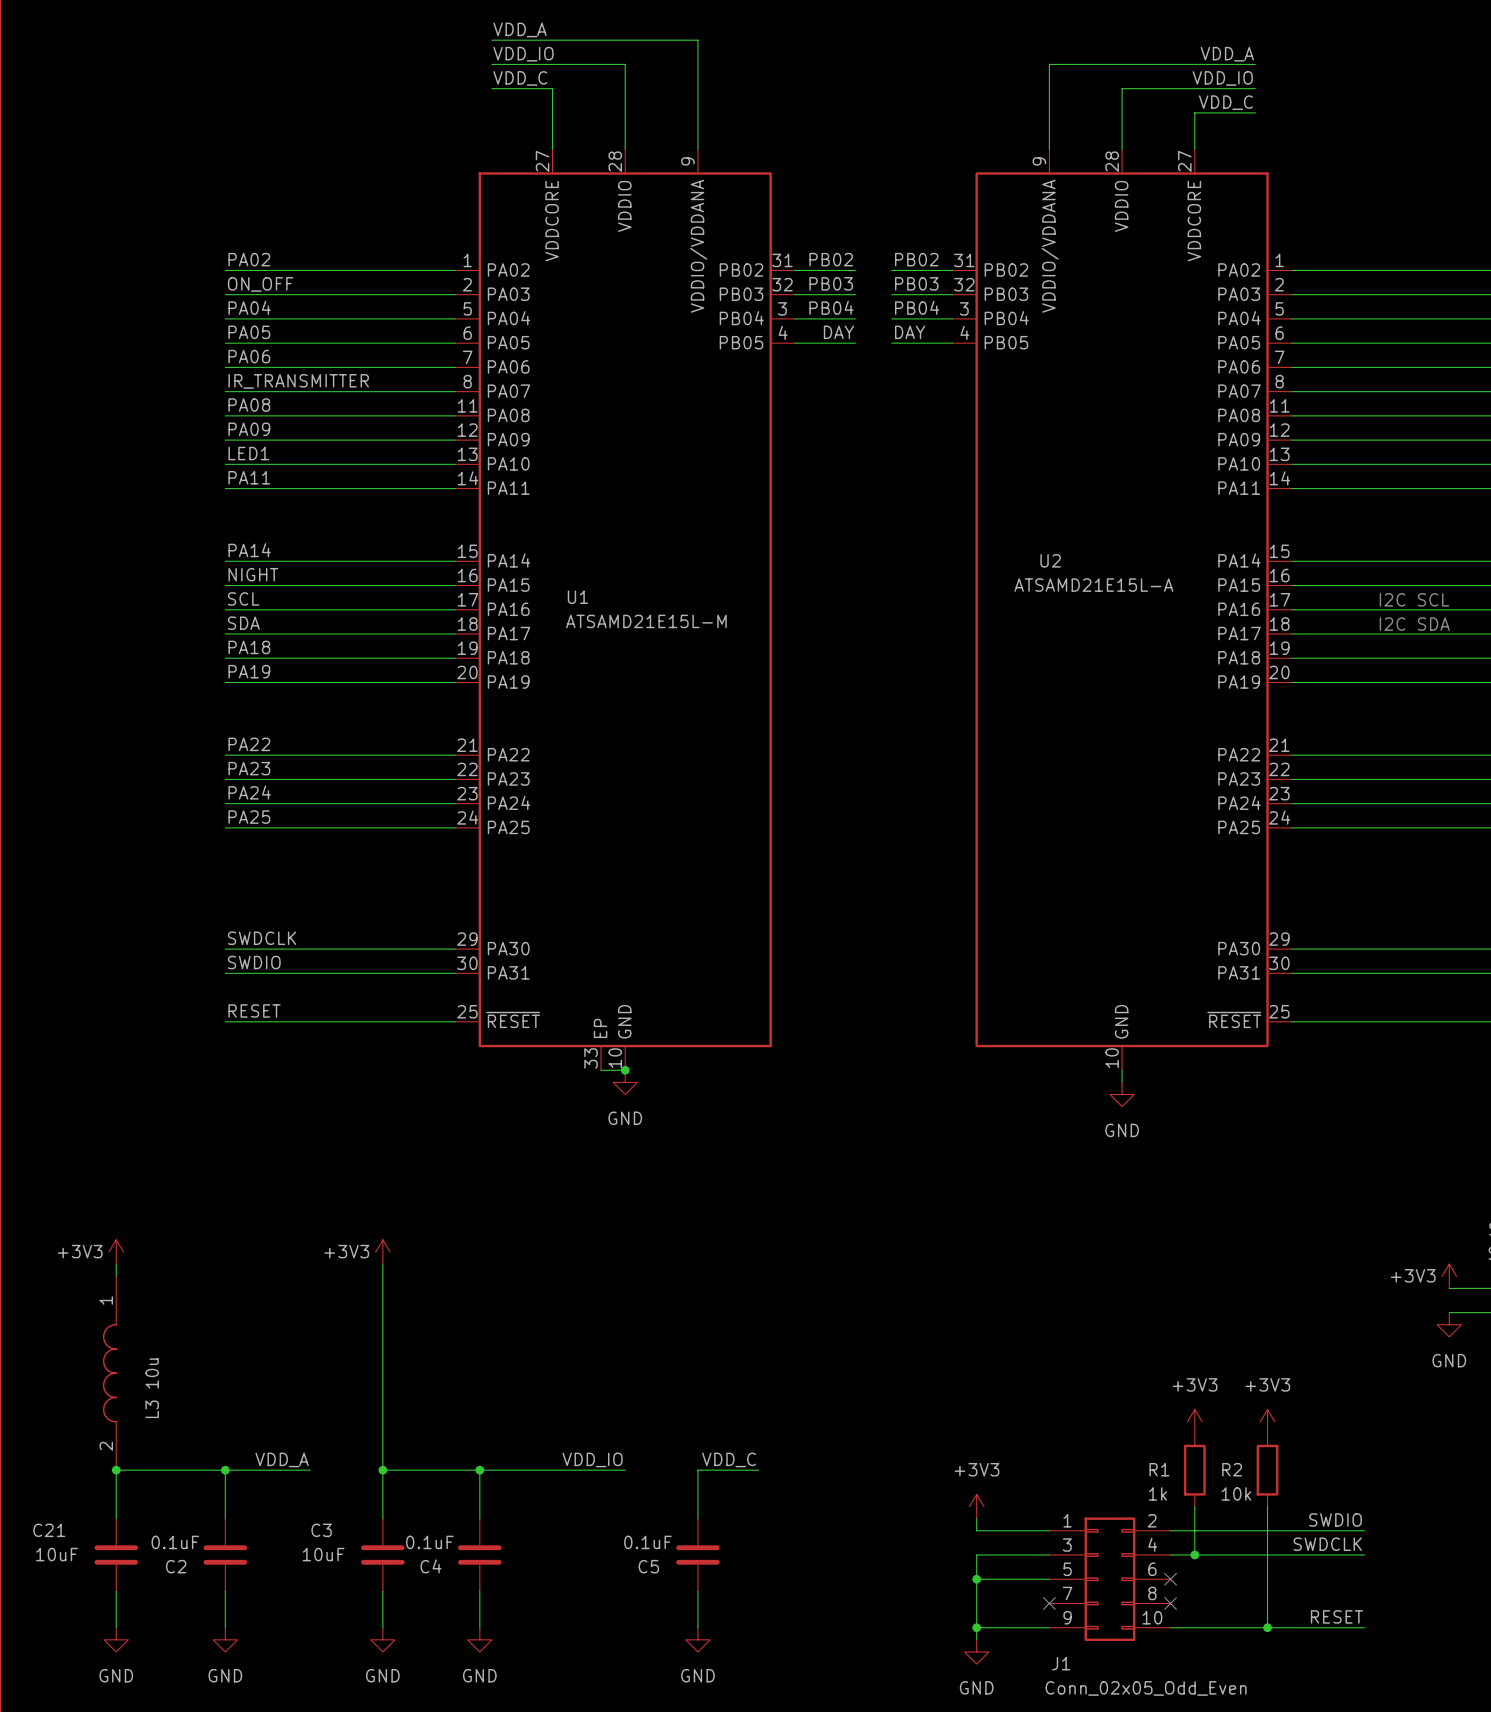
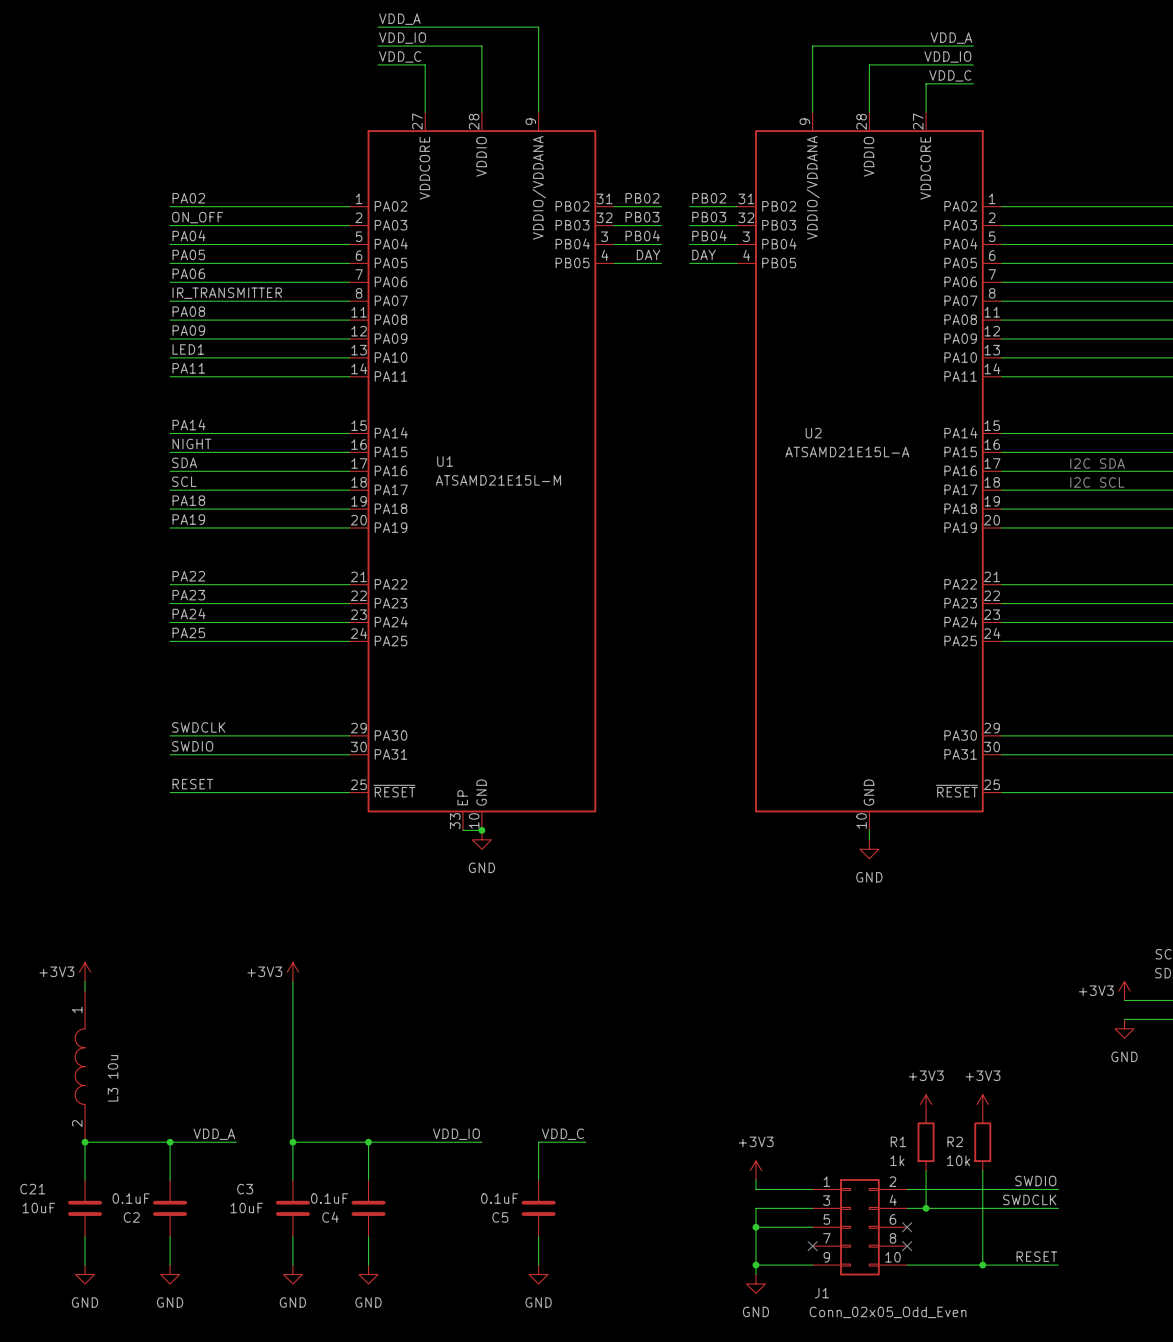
label: SCL (243, 598) -> SDA (184, 462)
text: I2C SCL (1414, 599) -> I2C SDA (1097, 463)
label: SDA (243, 623) -> SCL (184, 481)
text: I2C SDA (1414, 624) -> I2C SCL (1097, 482)

